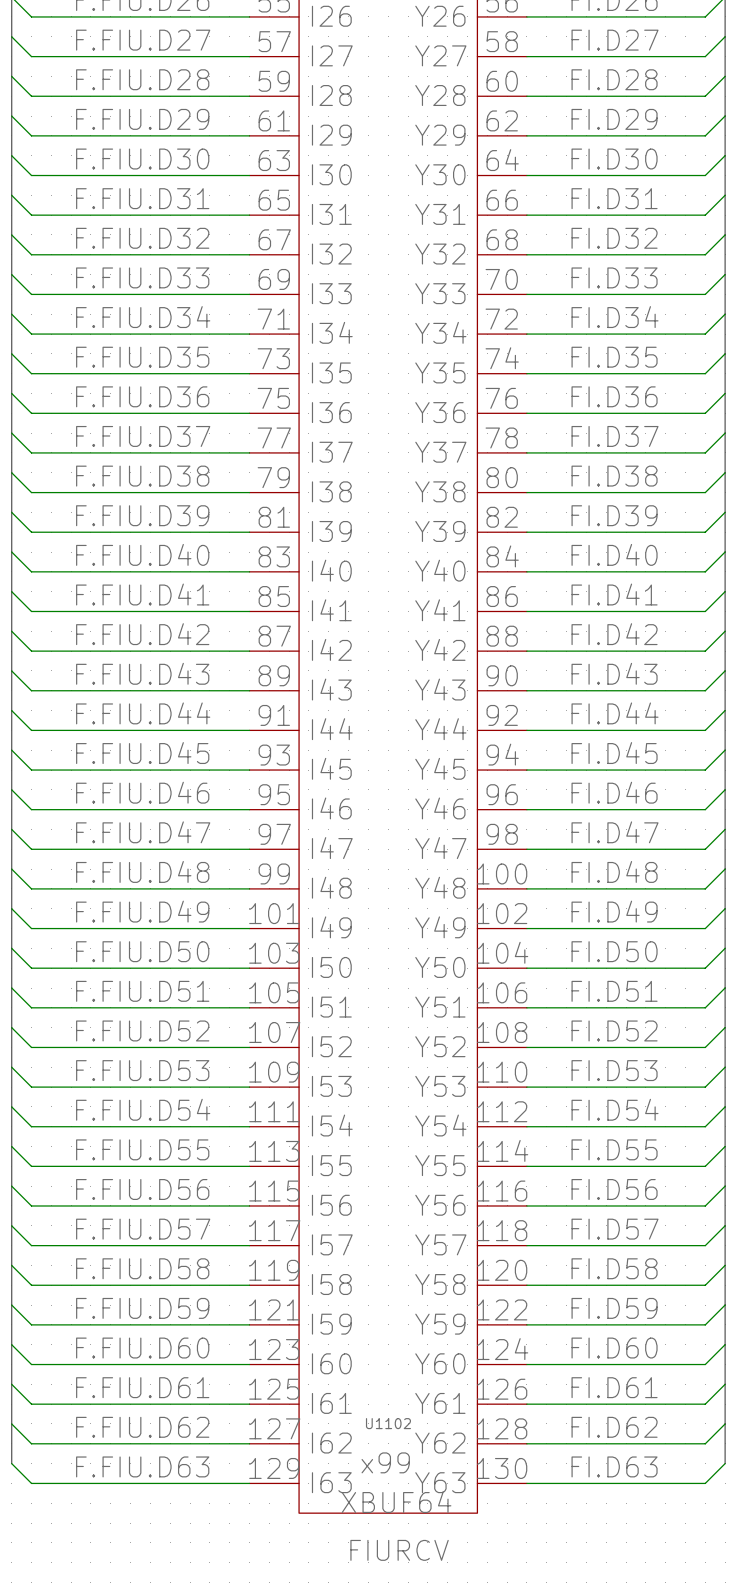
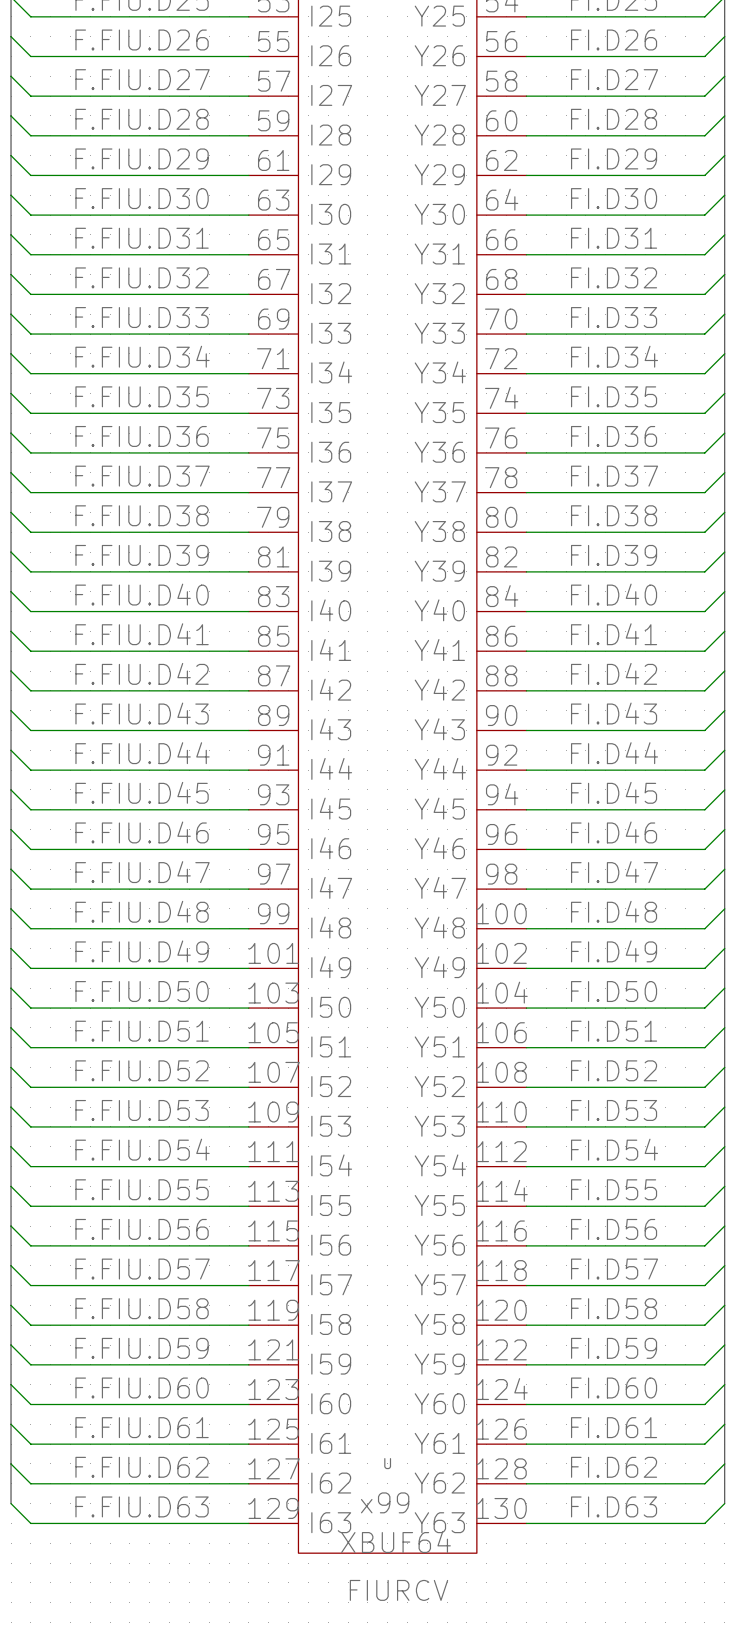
U1102 name: U1102 (388, 1423) -> U (387, 1463)

